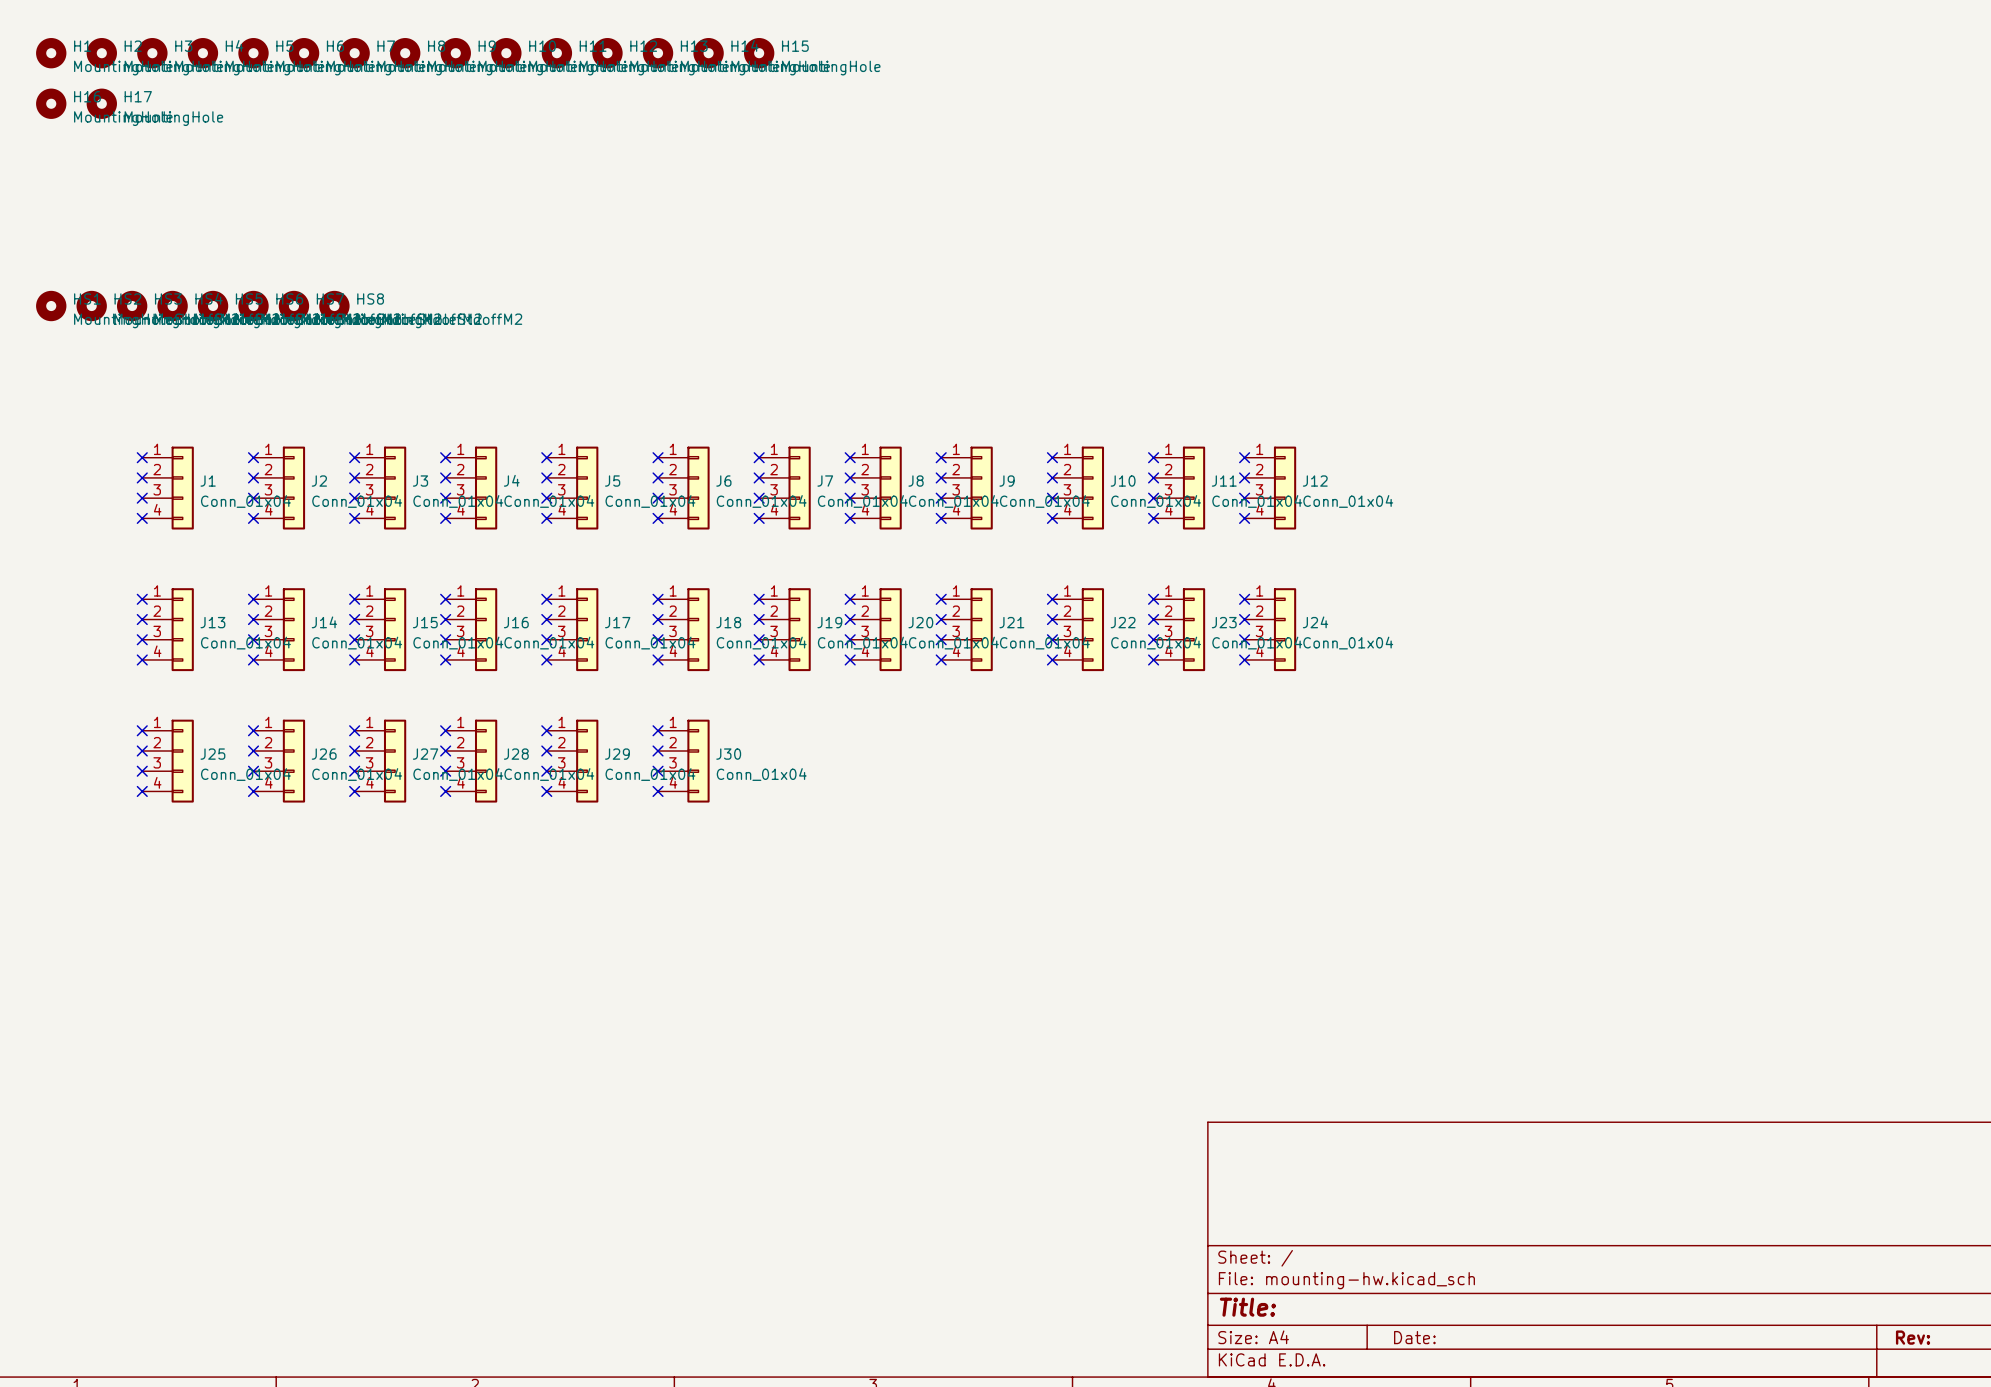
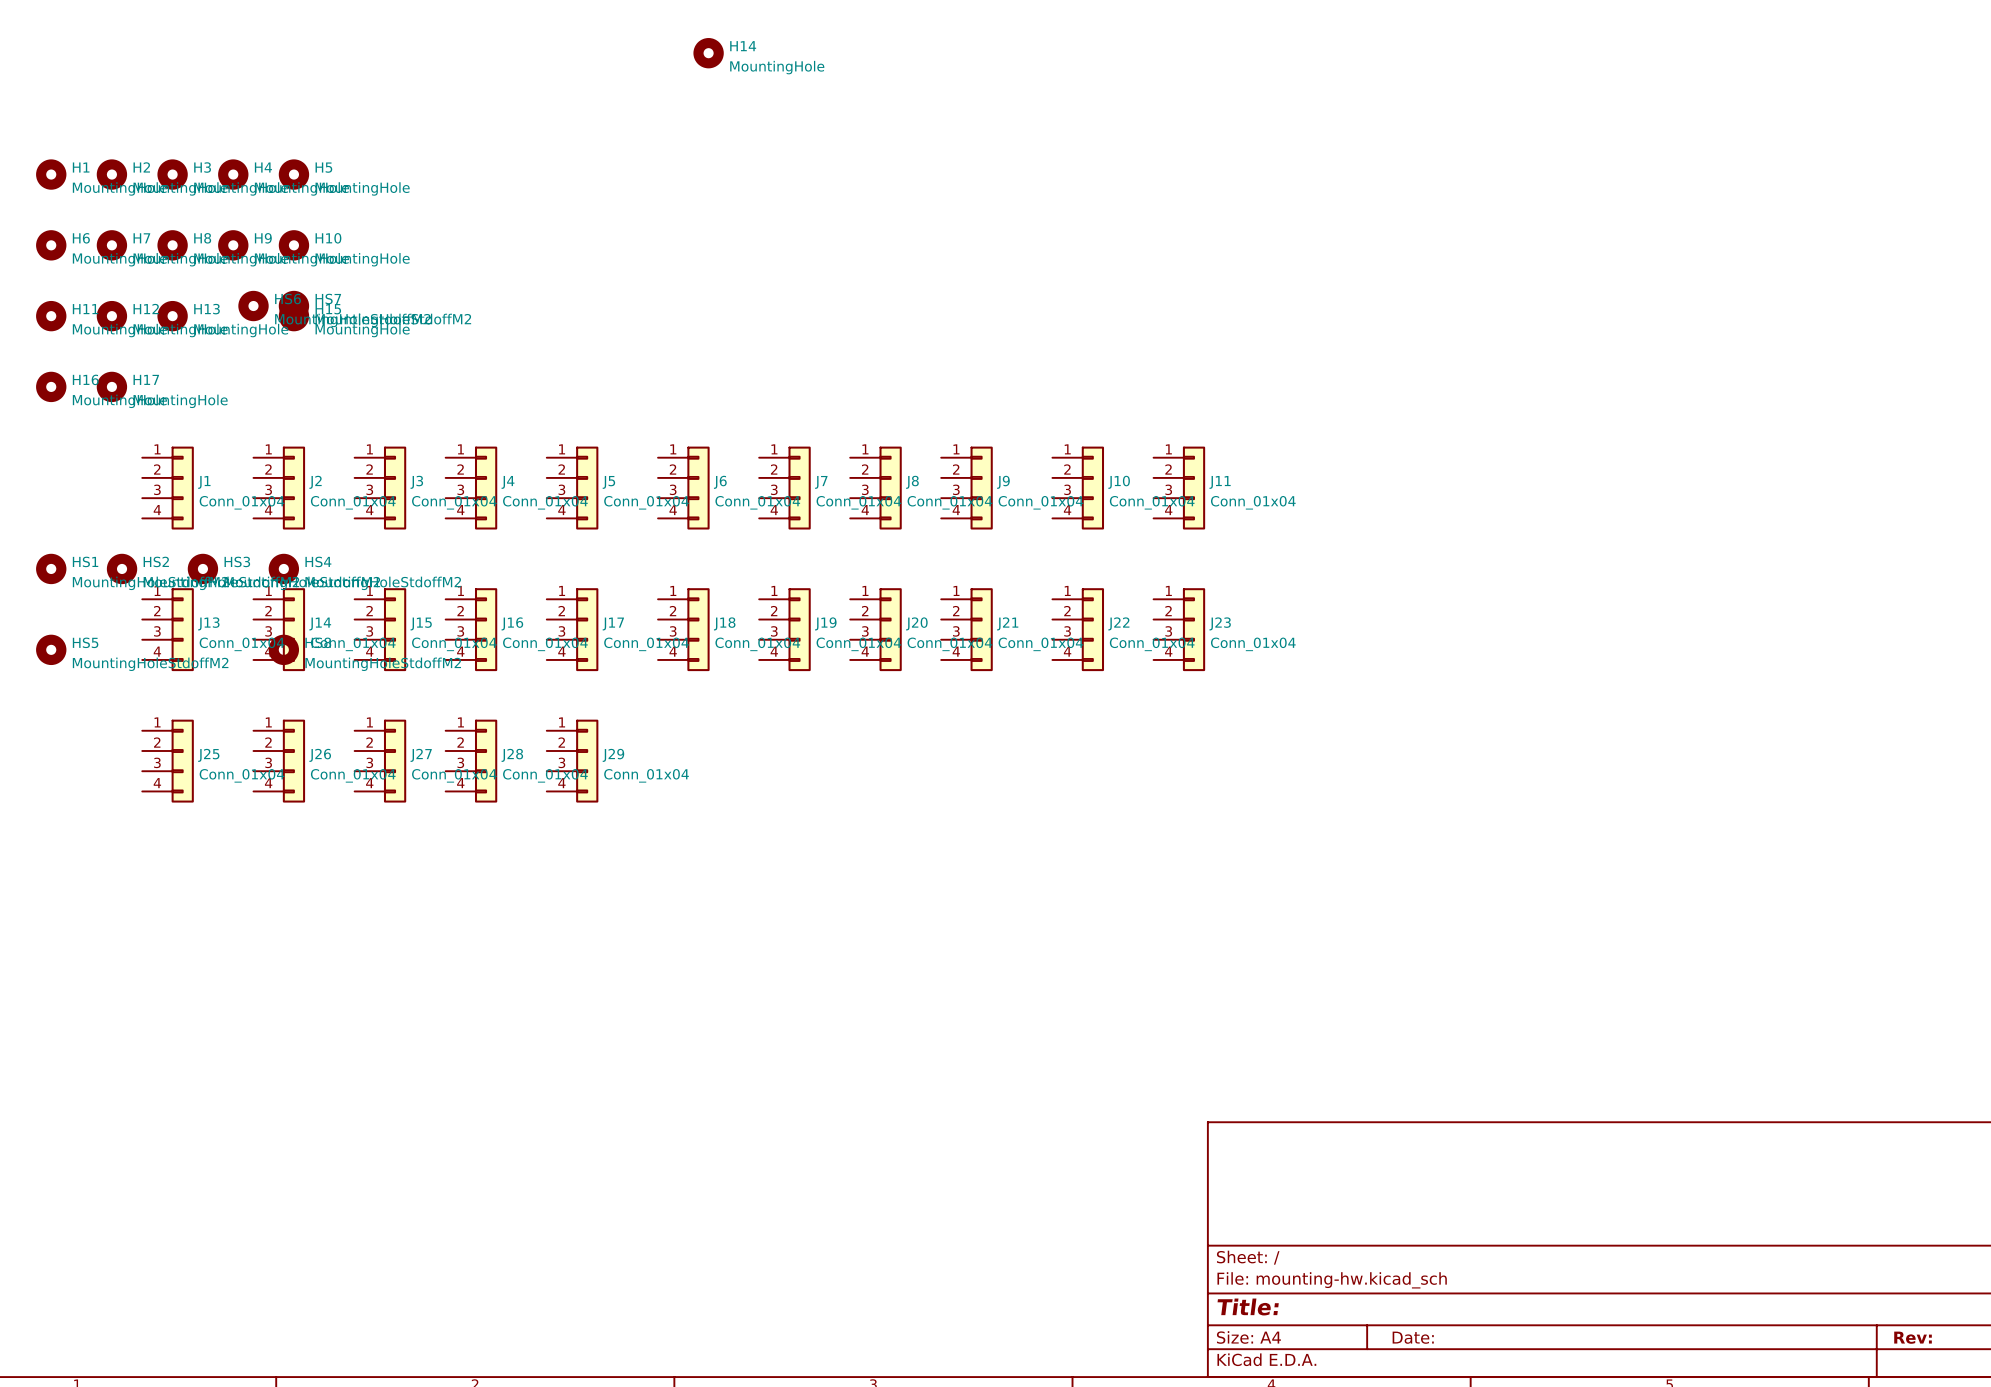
H1 position: (51, 53) -> (51, 174)
H2 position: (101, 53) -> (111, 174)
H3 position: (152, 53) -> (172, 174)
H4 position: (202, 53) -> (233, 174)
H5 position: (253, 53) -> (293, 174)
H6 position: (304, 53) -> (51, 245)
H7 position: (354, 53) -> (111, 245)
H8 position: (405, 53) -> (172, 245)
H9 position: (455, 53) -> (233, 245)
H10 position: (506, 53) -> (293, 245)
H11 position: (556, 53) -> (51, 316)
H12 position: (607, 53) -> (111, 316)
H13 position: (658, 53) -> (172, 316)
H15 position: (759, 53) -> (293, 316)
H16 position: (51, 103) -> (51, 386)
H17 position: (101, 103) -> (111, 386)
HS1 position: (51, 306) -> (51, 568)
HS2 position: (91, 306) -> (122, 568)
HS3 position: (132, 306) -> (202, 568)
HS4 position: (172, 306) -> (283, 568)
HS5 position: (213, 306) -> (51, 649)
HS8 position: (334, 306) -> (283, 649)
no-connect mark: (142, 457) -> none
no-connect mark: (253, 457) -> none
no-connect mark: (354, 457) -> none
no-connect mark: (445, 457) -> none
no-connect mark: (546, 457) -> none
no-connect mark: (658, 457) -> none
no-connect mark: (759, 457) -> none
no-connect mark: (850, 457) -> none
no-connect mark: (941, 457) -> none
no-connect mark: (1052, 457) -> none
no-connect mark: (1153, 457) -> none
no-connect mark: (1244, 457) -> none
no-connect mark: (142, 477) -> none
no-connect mark: (253, 477) -> none
no-connect mark: (354, 477) -> none
no-connect mark: (445, 477) -> none
no-connect mark: (546, 477) -> none
no-connect mark: (658, 477) -> none
no-connect mark: (759, 477) -> none
no-connect mark: (850, 477) -> none
no-connect mark: (941, 477) -> none
no-connect mark: (1052, 477) -> none
no-connect mark: (1153, 477) -> none
no-connect mark: (1244, 477) -> none
J12: Conn_01x04 (1270, 488) -> none
no-connect mark: (142, 498) -> none
no-connect mark: (253, 498) -> none
no-connect mark: (354, 498) -> none
no-connect mark: (445, 498) -> none
no-connect mark: (546, 498) -> none
no-connect mark: (658, 498) -> none
no-connect mark: (759, 498) -> none
no-connect mark: (850, 498) -> none
no-connect mark: (941, 498) -> none
no-connect mark: (1052, 498) -> none
no-connect mark: (1153, 498) -> none
no-connect mark: (1244, 498) -> none
no-connect mark: (142, 518) -> none
no-connect mark: (253, 518) -> none
no-connect mark: (354, 518) -> none
no-connect mark: (445, 518) -> none
no-connect mark: (546, 518) -> none
no-connect mark: (658, 518) -> none
no-connect mark: (759, 518) -> none
no-connect mark: (850, 518) -> none
no-connect mark: (941, 518) -> none
no-connect mark: (1052, 518) -> none
no-connect mark: (1153, 518) -> none
no-connect mark: (1244, 518) -> none
no-connect mark: (142, 599) -> none
no-connect mark: (253, 599) -> none
no-connect mark: (354, 599) -> none
no-connect mark: (445, 599) -> none
no-connect mark: (546, 599) -> none
no-connect mark: (658, 599) -> none
no-connect mark: (759, 599) -> none
no-connect mark: (850, 599) -> none
no-connect mark: (941, 599) -> none
no-connect mark: (1052, 599) -> none
no-connect mark: (1153, 599) -> none
no-connect mark: (1244, 599) -> none
no-connect mark: (142, 619) -> none
no-connect mark: (253, 619) -> none
no-connect mark: (354, 619) -> none
no-connect mark: (445, 619) -> none
no-connect mark: (546, 619) -> none
no-connect mark: (658, 619) -> none
no-connect mark: (759, 619) -> none
no-connect mark: (850, 619) -> none
no-connect mark: (941, 619) -> none
no-connect mark: (1052, 619) -> none
no-connect mark: (1153, 619) -> none
no-connect mark: (1244, 619) -> none
J24: Conn_01x04 (1270, 629) -> none
no-connect mark: (142, 639) -> none
no-connect mark: (253, 639) -> none
no-connect mark: (354, 639) -> none
no-connect mark: (445, 639) -> none
no-connect mark: (546, 639) -> none
no-connect mark: (658, 639) -> none
no-connect mark: (759, 639) -> none
no-connect mark: (850, 639) -> none
no-connect mark: (941, 639) -> none
no-connect mark: (1052, 639) -> none
no-connect mark: (1153, 639) -> none
no-connect mark: (1244, 639) -> none
no-connect mark: (142, 659) -> none
no-connect mark: (253, 659) -> none
no-connect mark: (354, 659) -> none
no-connect mark: (445, 659) -> none
no-connect mark: (546, 659) -> none
no-connect mark: (658, 659) -> none
no-connect mark: (759, 659) -> none
no-connect mark: (850, 659) -> none
no-connect mark: (941, 659) -> none
no-connect mark: (1052, 659) -> none
no-connect mark: (1153, 659) -> none
no-connect mark: (1244, 659) -> none
no-connect mark: (142, 730) -> none
no-connect mark: (253, 730) -> none
no-connect mark: (354, 730) -> none
no-connect mark: (445, 730) -> none
no-connect mark: (546, 730) -> none
no-connect mark: (658, 730) -> none
no-connect mark: (142, 750) -> none
no-connect mark: (253, 750) -> none
no-connect mark: (354, 750) -> none
no-connect mark: (445, 750) -> none
no-connect mark: (546, 750) -> none
no-connect mark: (658, 750) -> none
J30: Conn_01x04 (683, 761) -> none
no-connect mark: (142, 771) -> none
no-connect mark: (253, 771) -> none
no-connect mark: (354, 771) -> none
no-connect mark: (445, 771) -> none
no-connect mark: (546, 771) -> none
no-connect mark: (658, 771) -> none
no-connect mark: (142, 791) -> none
no-connect mark: (253, 791) -> none
no-connect mark: (354, 791) -> none
no-connect mark: (445, 791) -> none
no-connect mark: (546, 791) -> none
no-connect mark: (658, 791) -> none

